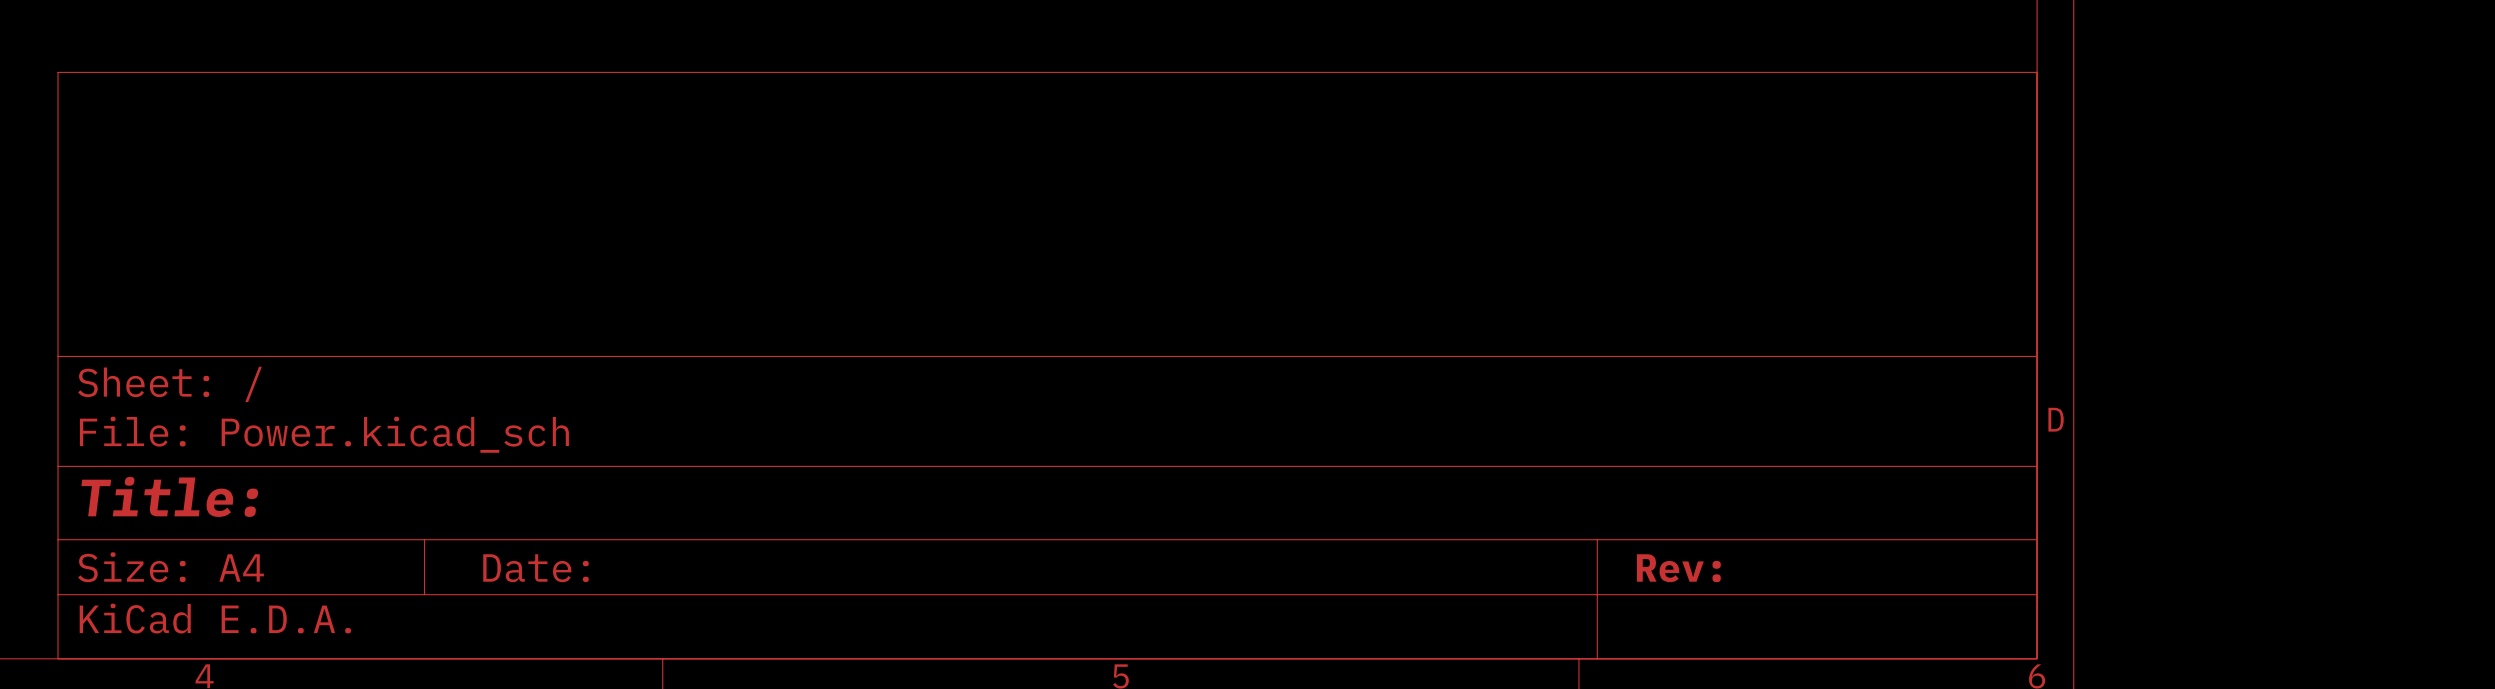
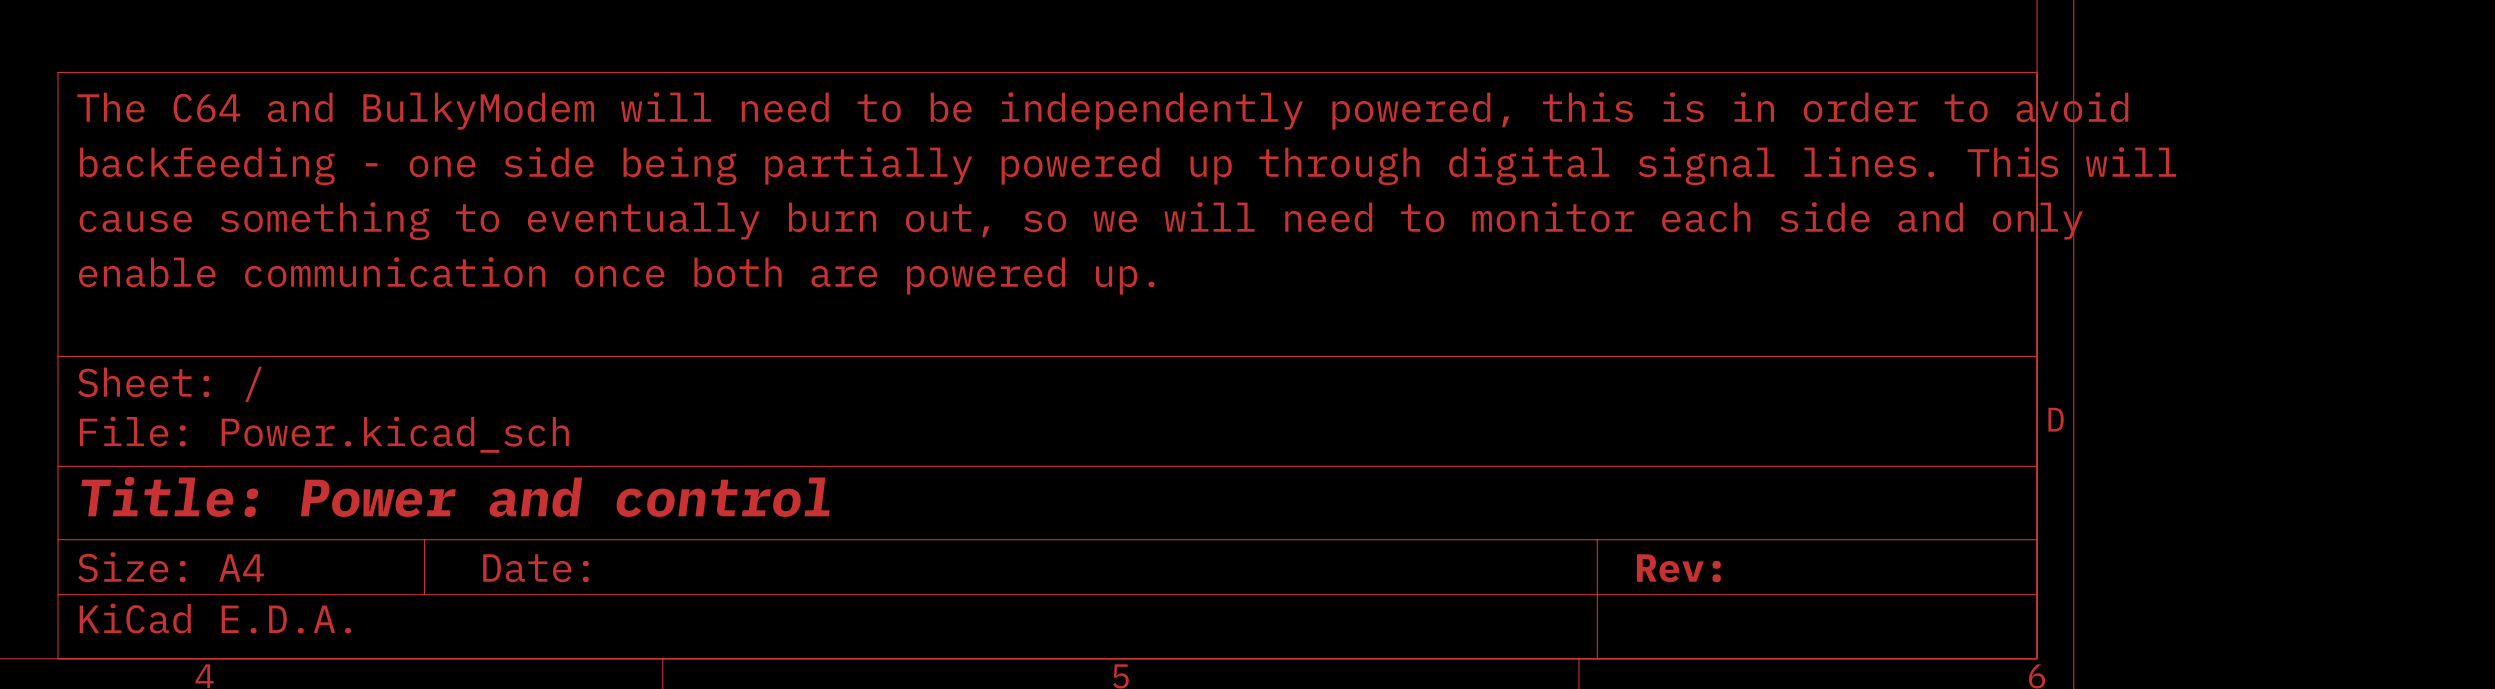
title block: none -> The C64 and BulkyModem will need to be independently powered, this is in order to avoid (1102, 110)
title block: none -> backfeeding - one side being partially powered up through digital signal lines. This will (1128, 166)
title block: none -> cause something to eventually burn out, so we will need to monitor each side and only (1081, 221)
title block: none -> enable communication once both are powered up. (616, 275)
title block: Title: (169, 496) -> Title: Power and control (455, 496)

